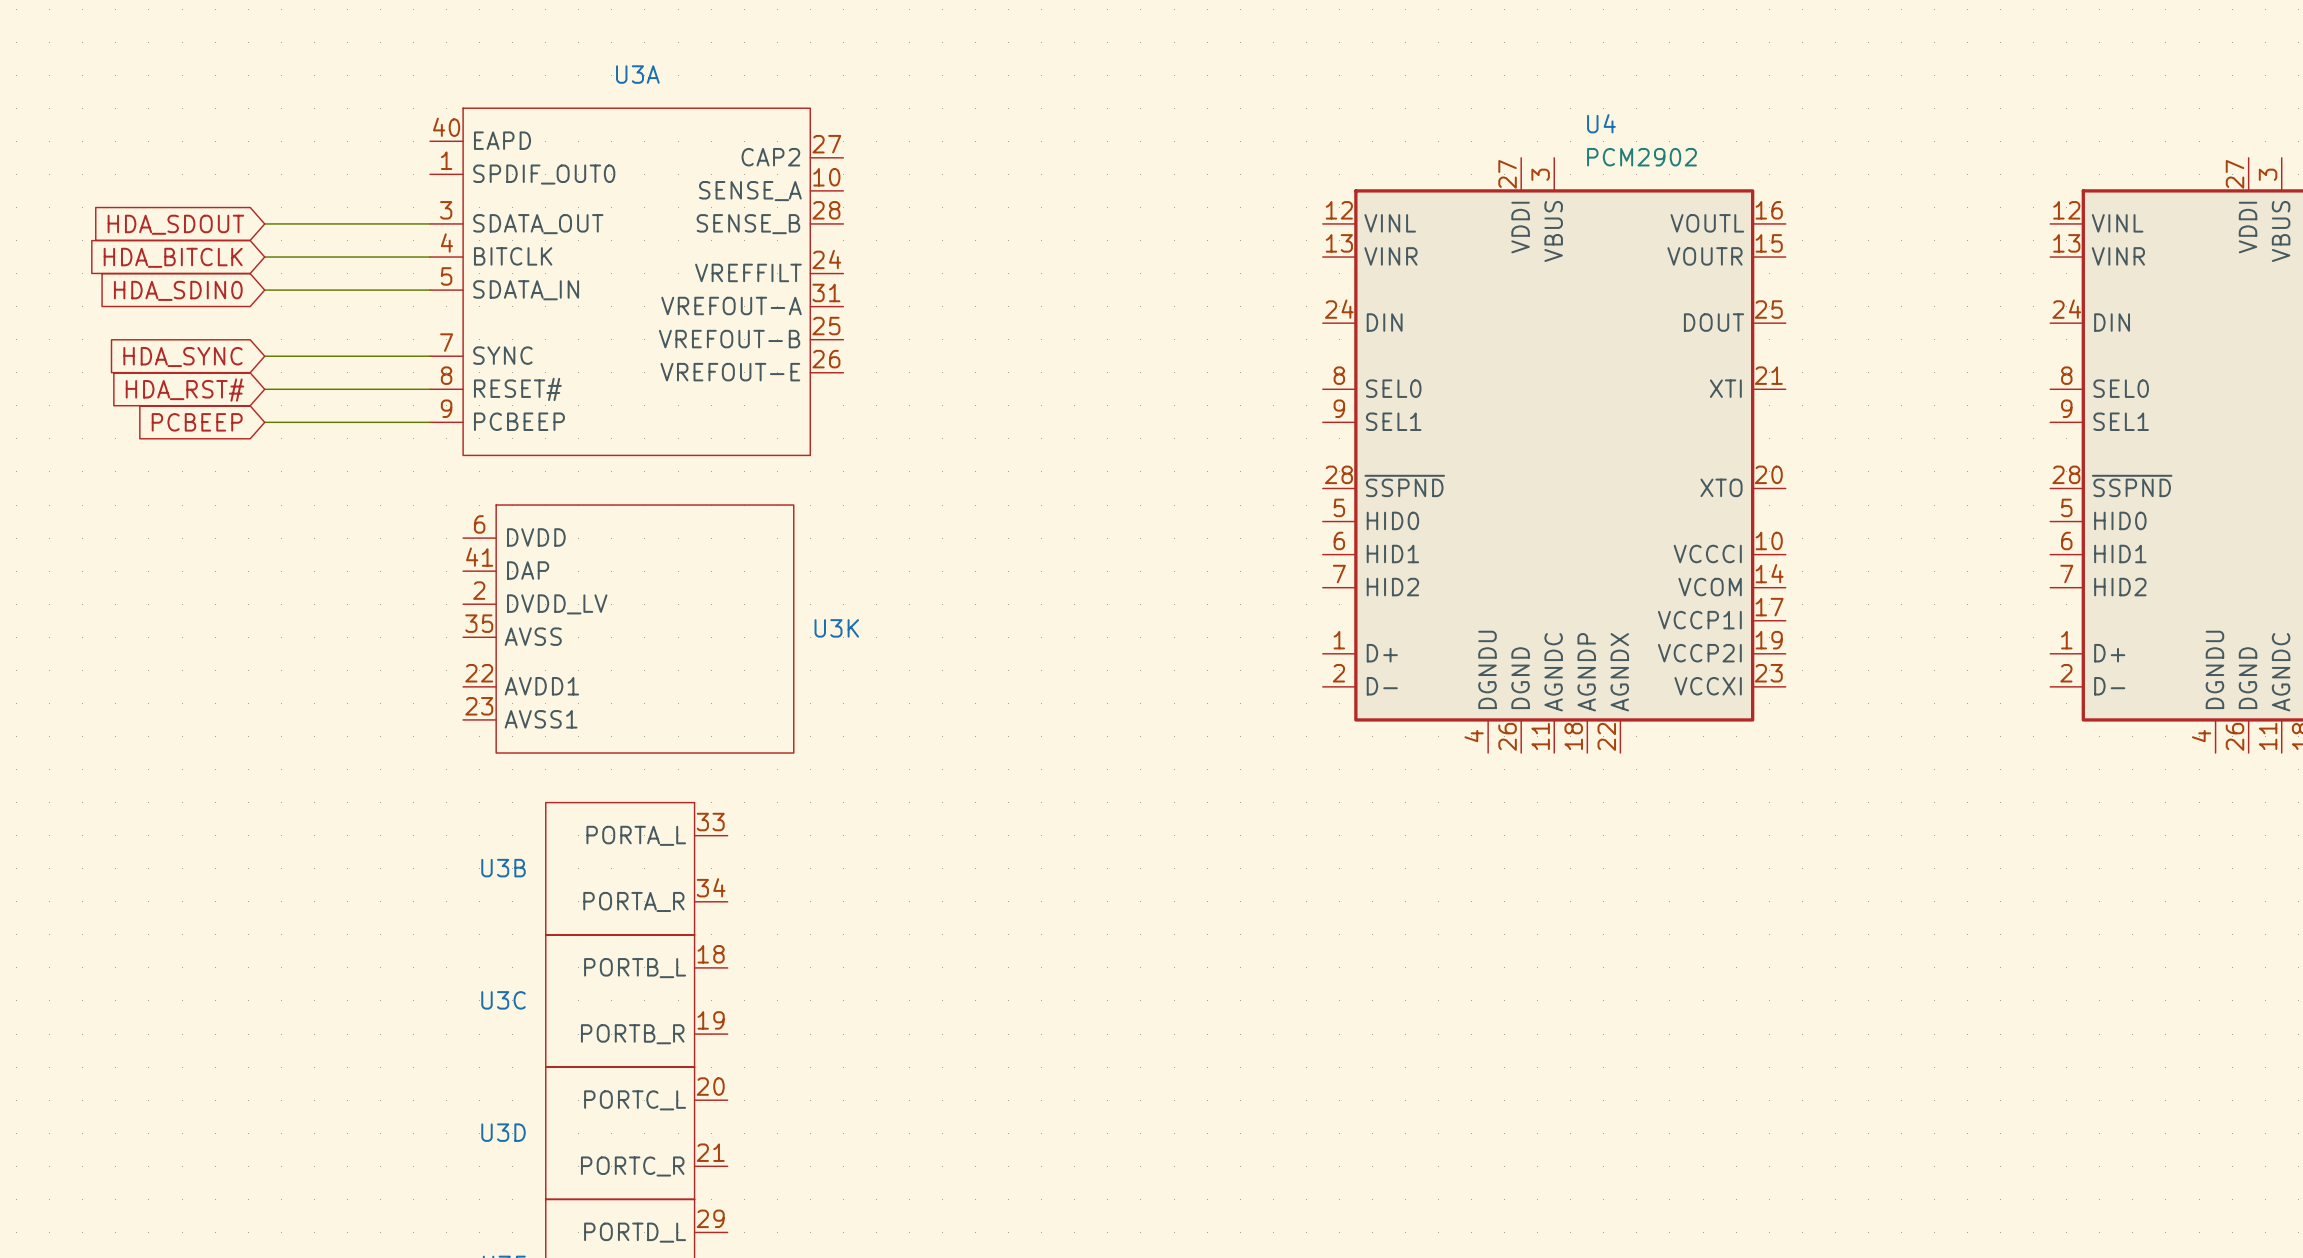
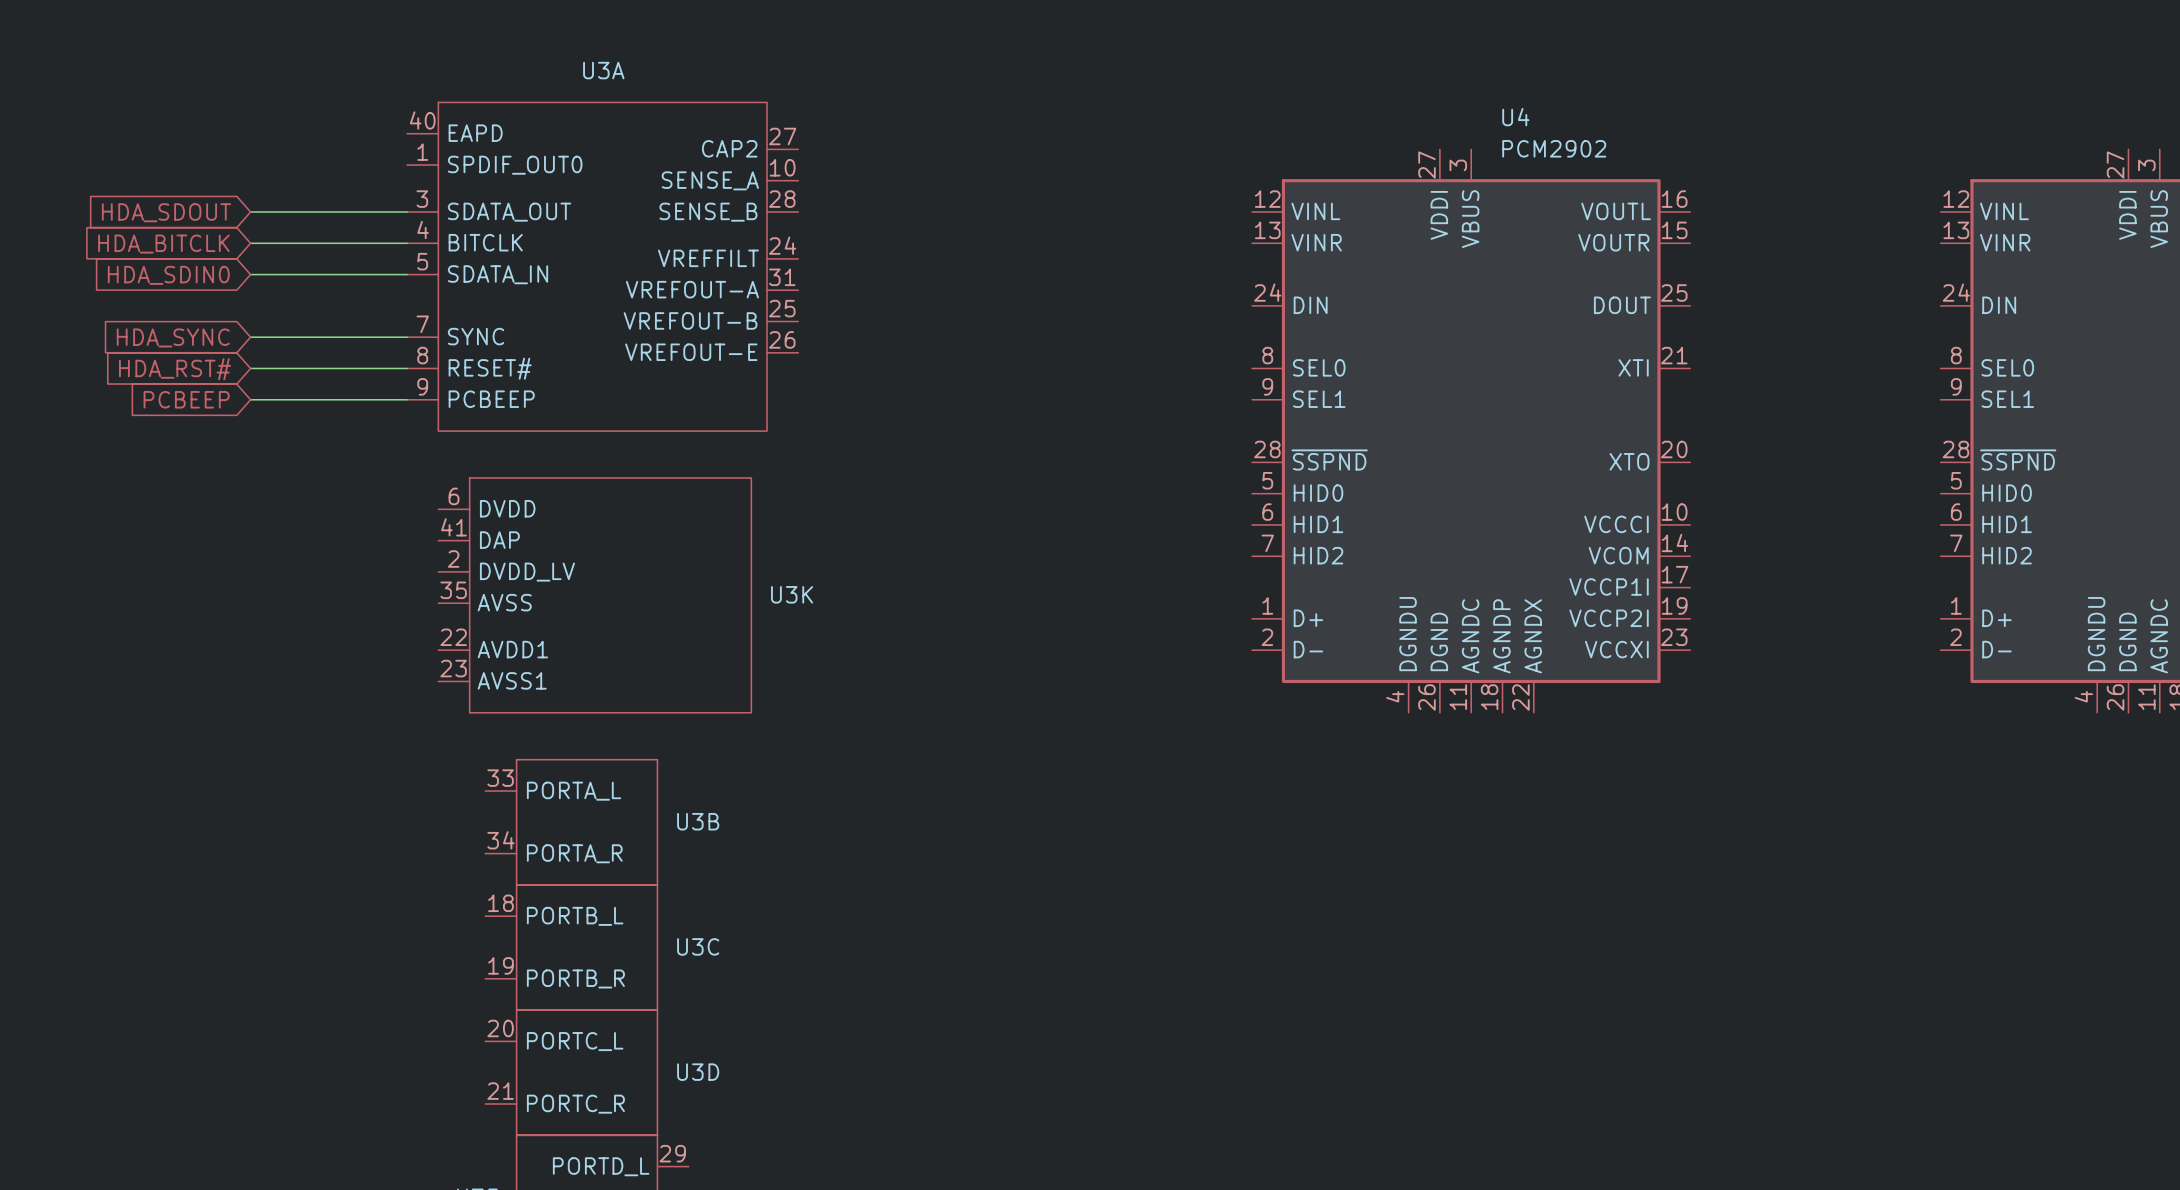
U3B flip: as is (620, 868) -> left-right (587, 822)
U3C flip: as is (620, 1000) -> left-right (587, 947)
U3D flip: as is (620, 1133) -> left-right (587, 1072)

